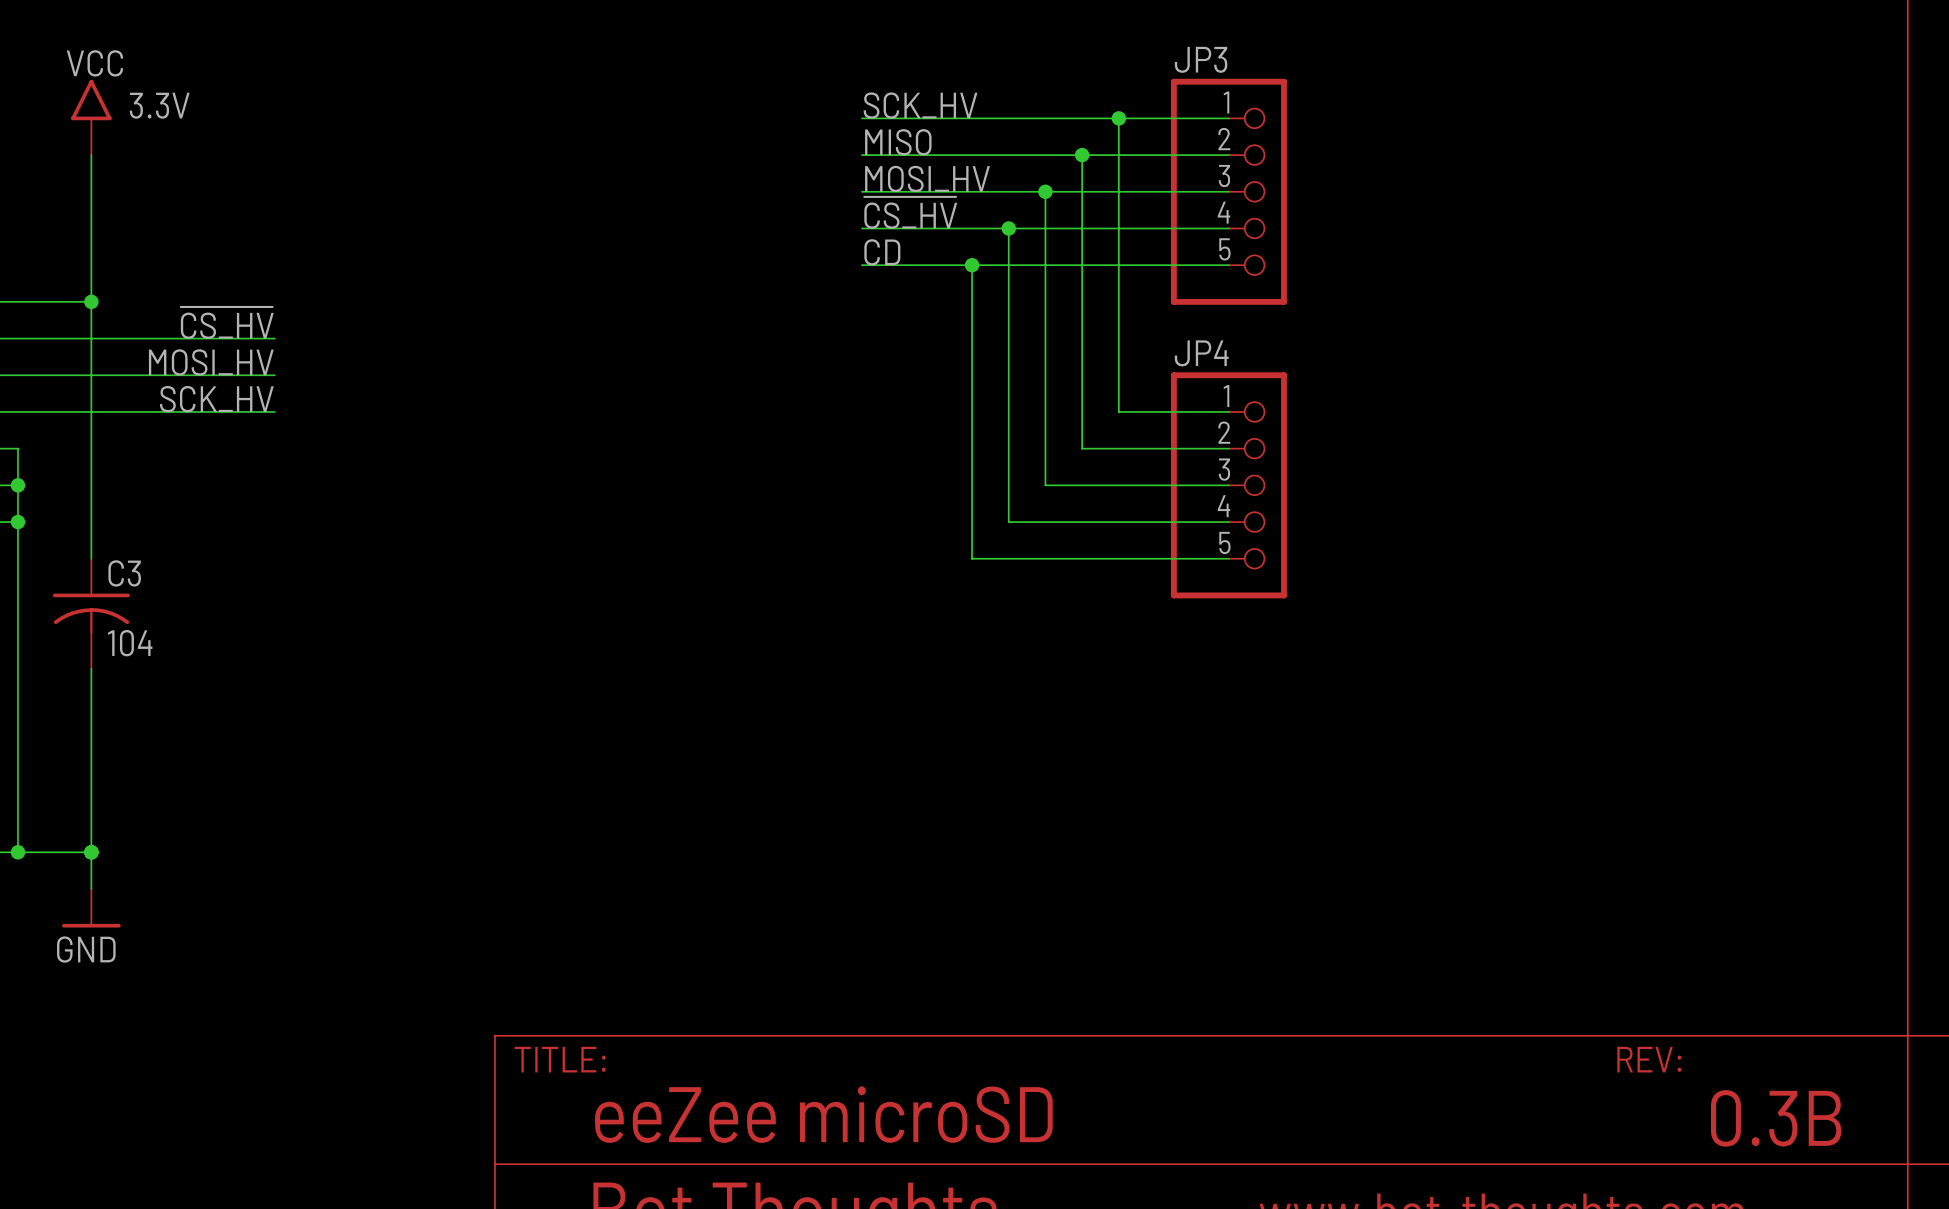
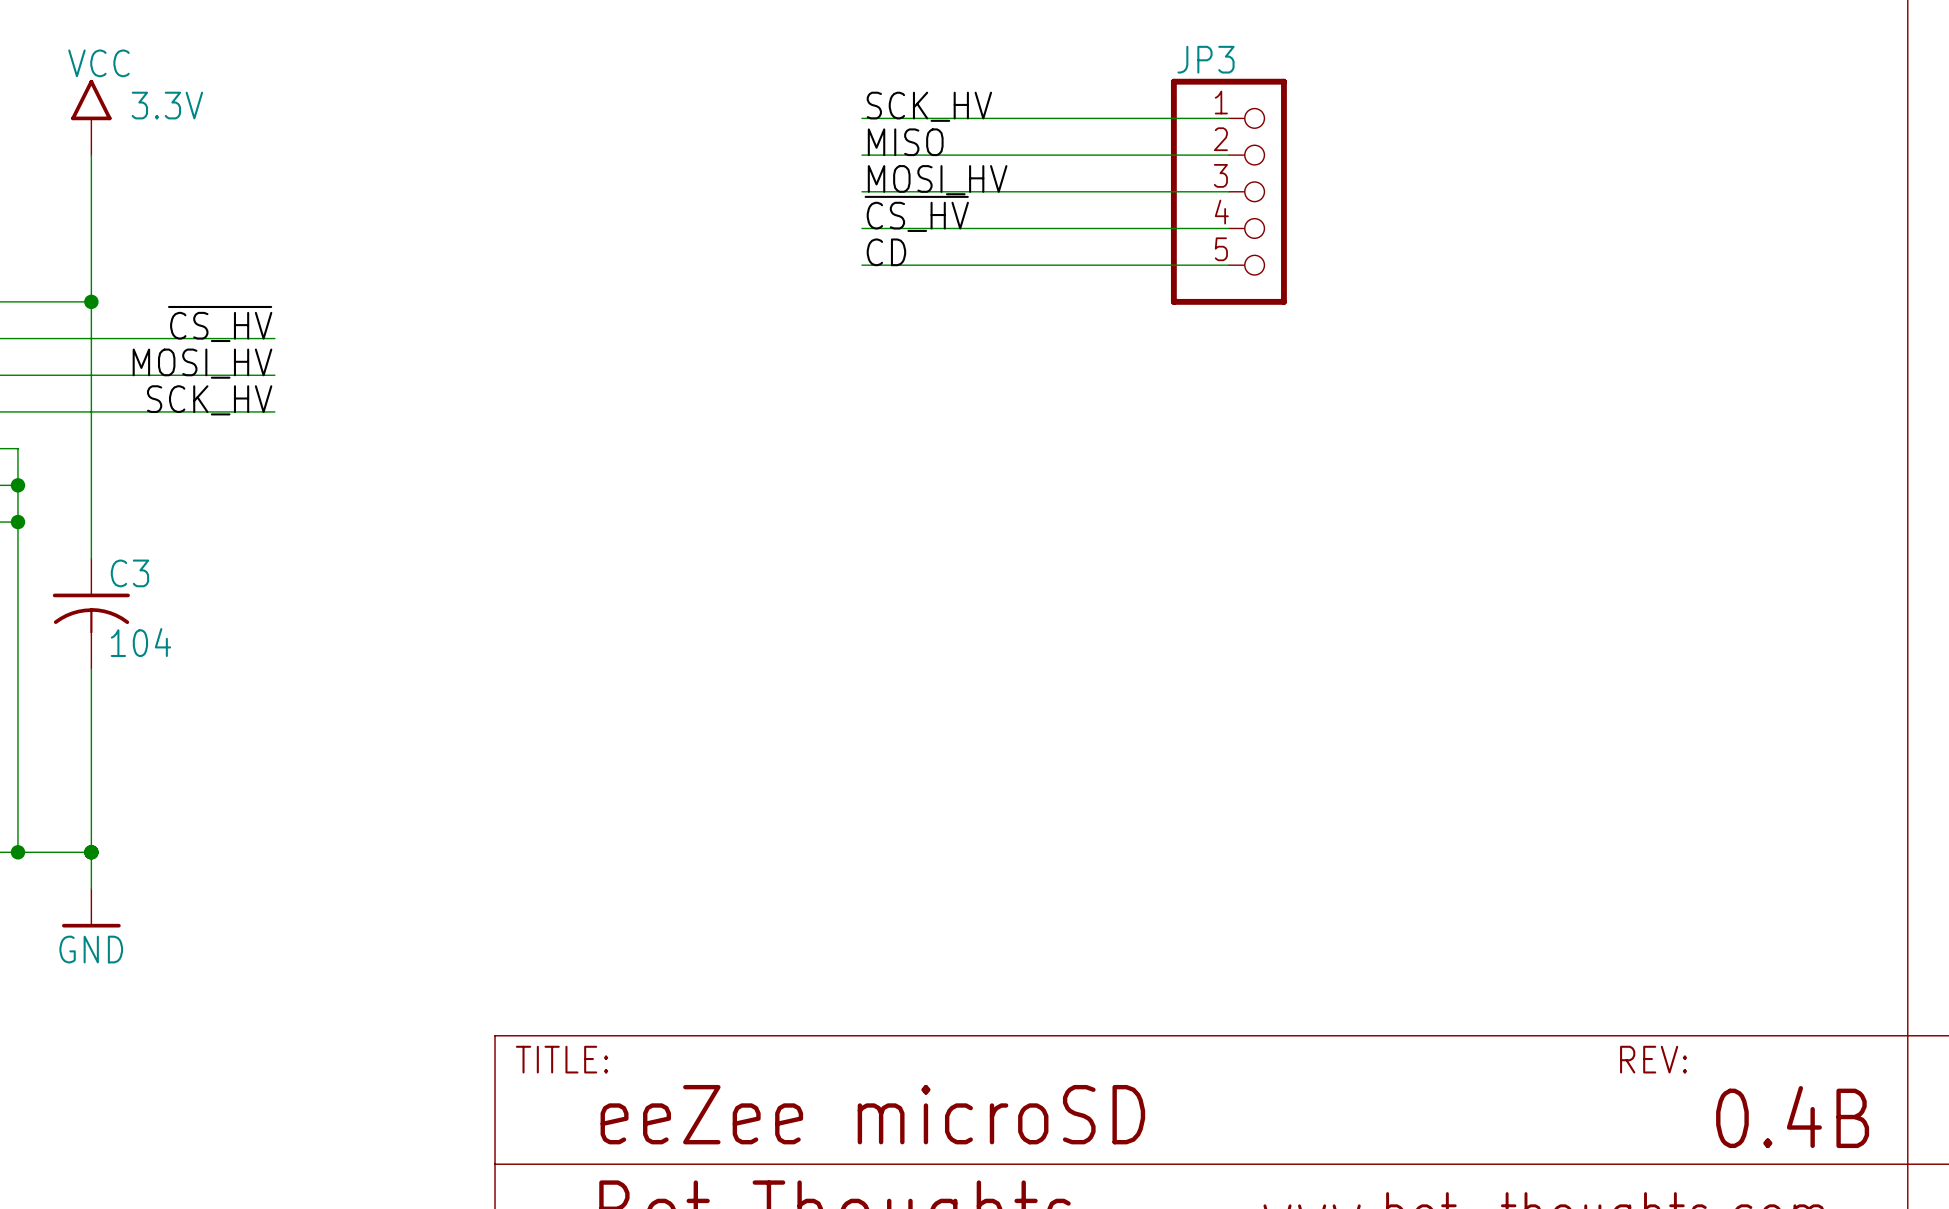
wire: (1118, 118) (1118, 411) (1228, 411) -> none
junction: (1118, 118) -> none
wire: (1082, 155) (1082, 448) (1228, 448) -> none
junction: (1082, 155) -> none
wire: (1045, 191) (1045, 485) (1228, 485) -> none
junction: (1045, 191) -> none
wire: (1008, 228) (1008, 522) (1228, 522) -> none
junction: (1008, 228) -> none
wire: (972, 265) (972, 558) (1228, 558) -> none
junction: (972, 265) -> none
JP4: (1228, 485) -> none
text: 0.3B (1776, 1118) -> 0.4B (1792, 1117)

